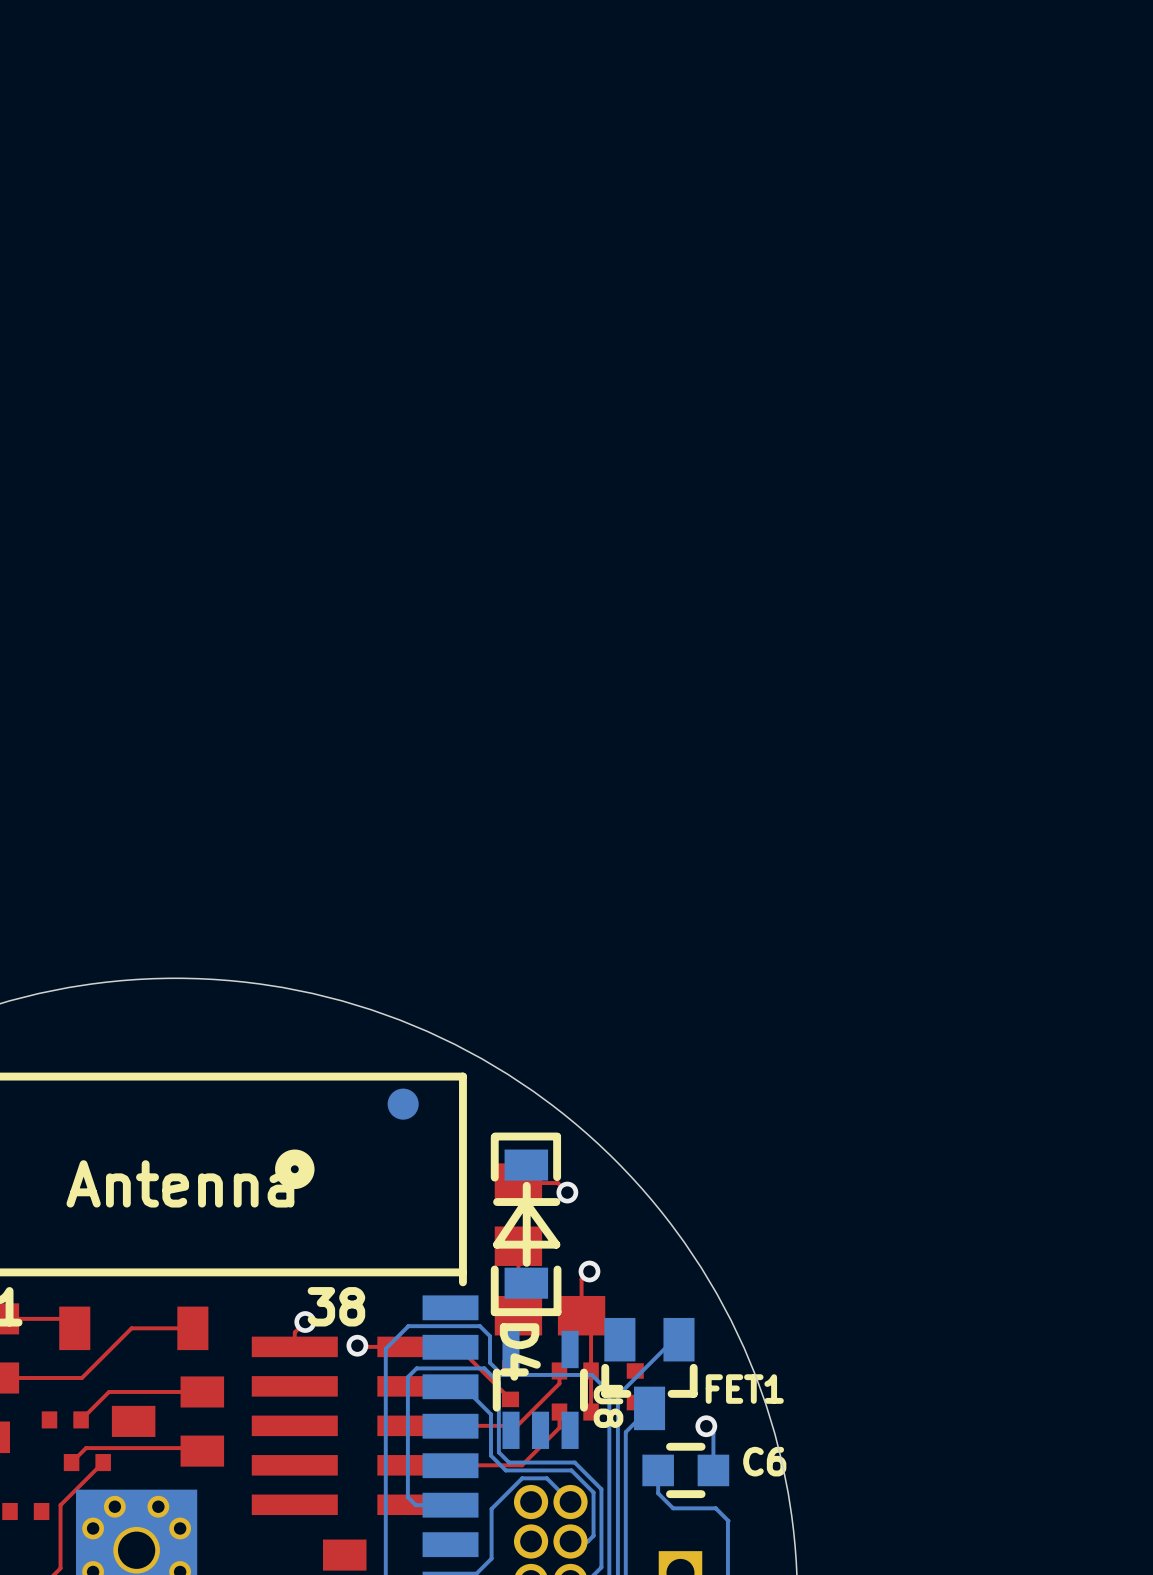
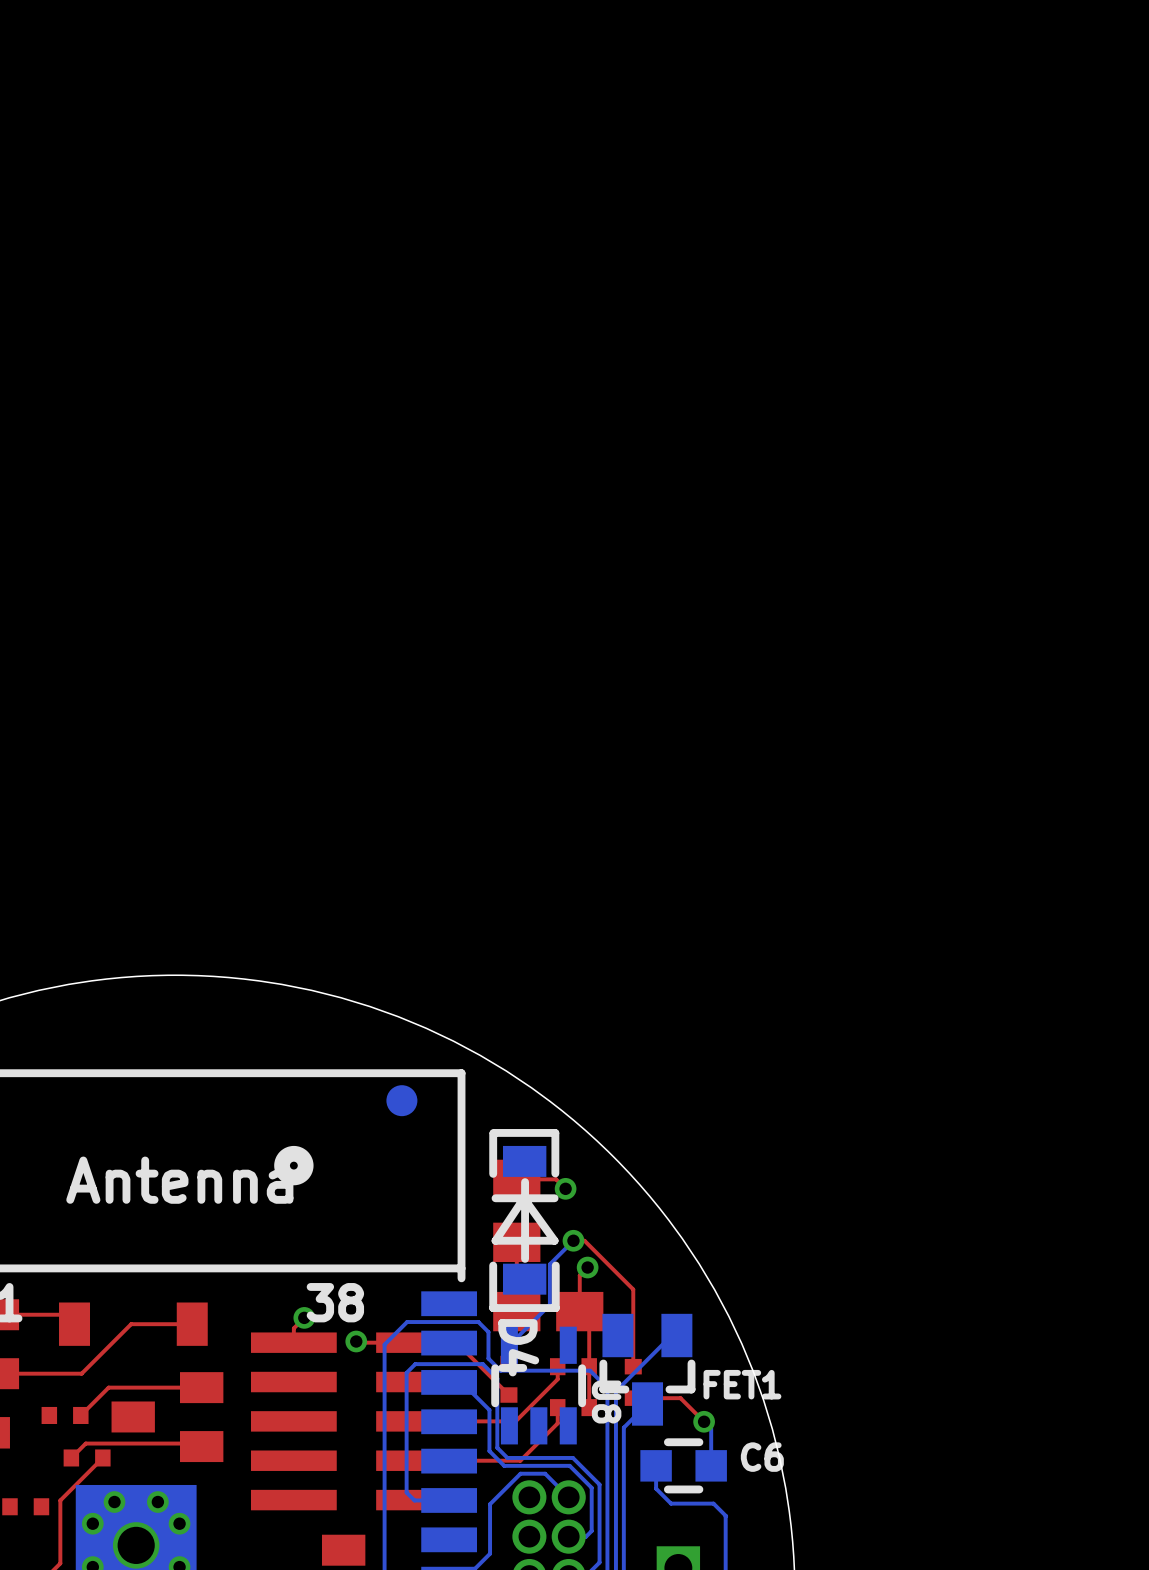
top track: none -> (573, 1240) (584, 1240) (633, 1289) (633, 1366)
bottom track: none -> (573, 1240) (549, 1264) (549, 1304) (509, 1345)
via: none -> (573, 1240)
top track: none -> (633, 1398) (680, 1398) (704, 1421)

